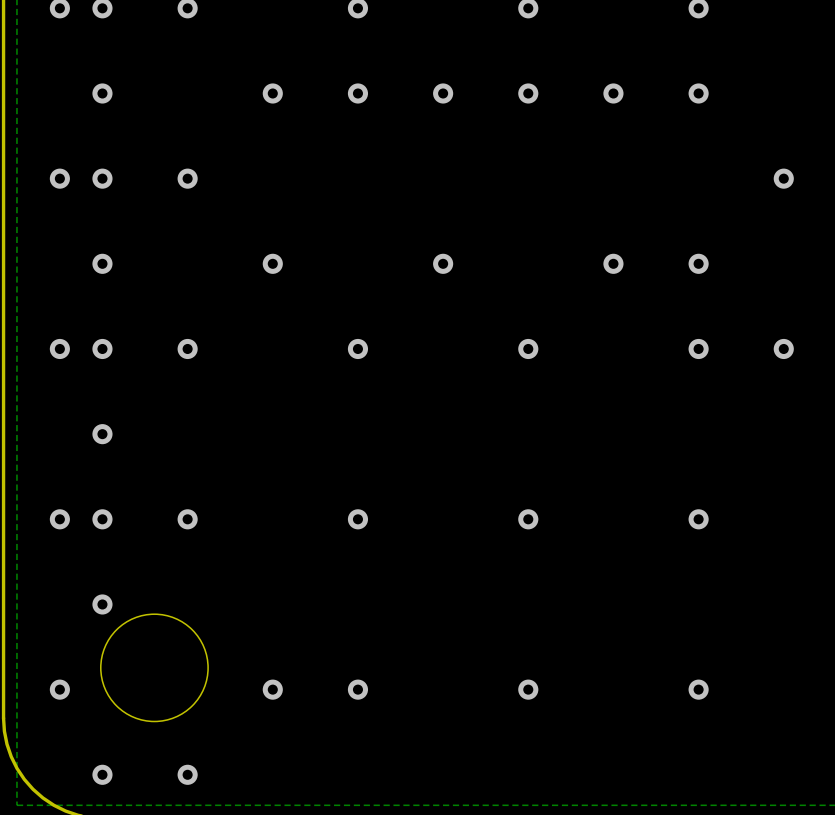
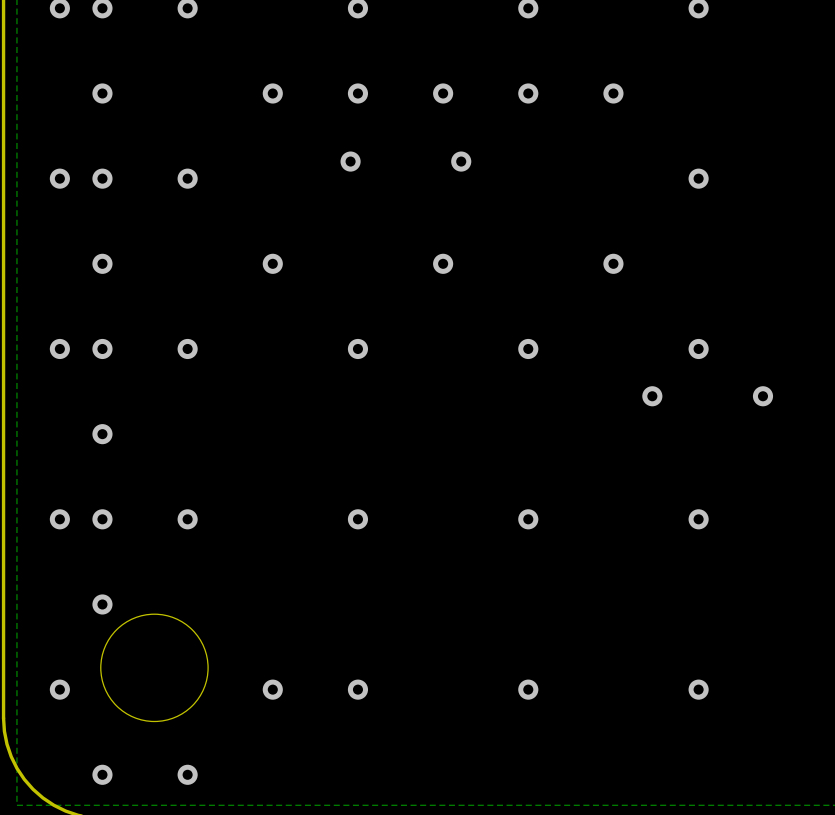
via: (698, 93) -> none
via: none -> (350, 161)
via: none -> (461, 161)
via: none -> (698, 178)
via: (783, 178) -> none
via: (698, 263) -> none
via position: (783, 348) -> (762, 396)
via: none -> (652, 396)

